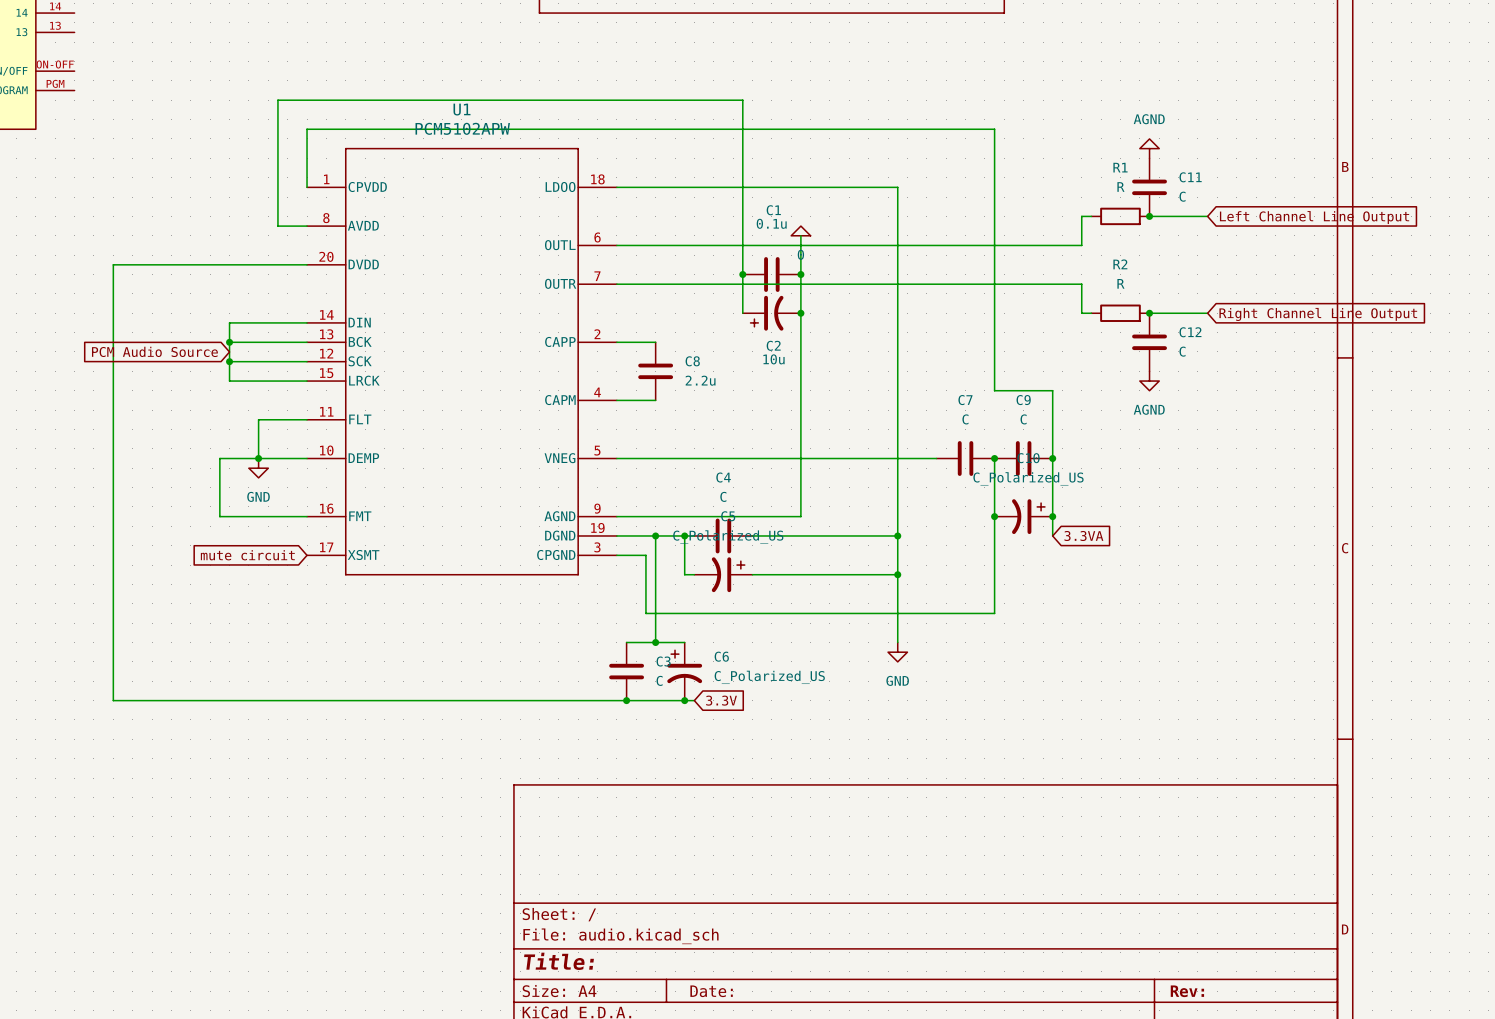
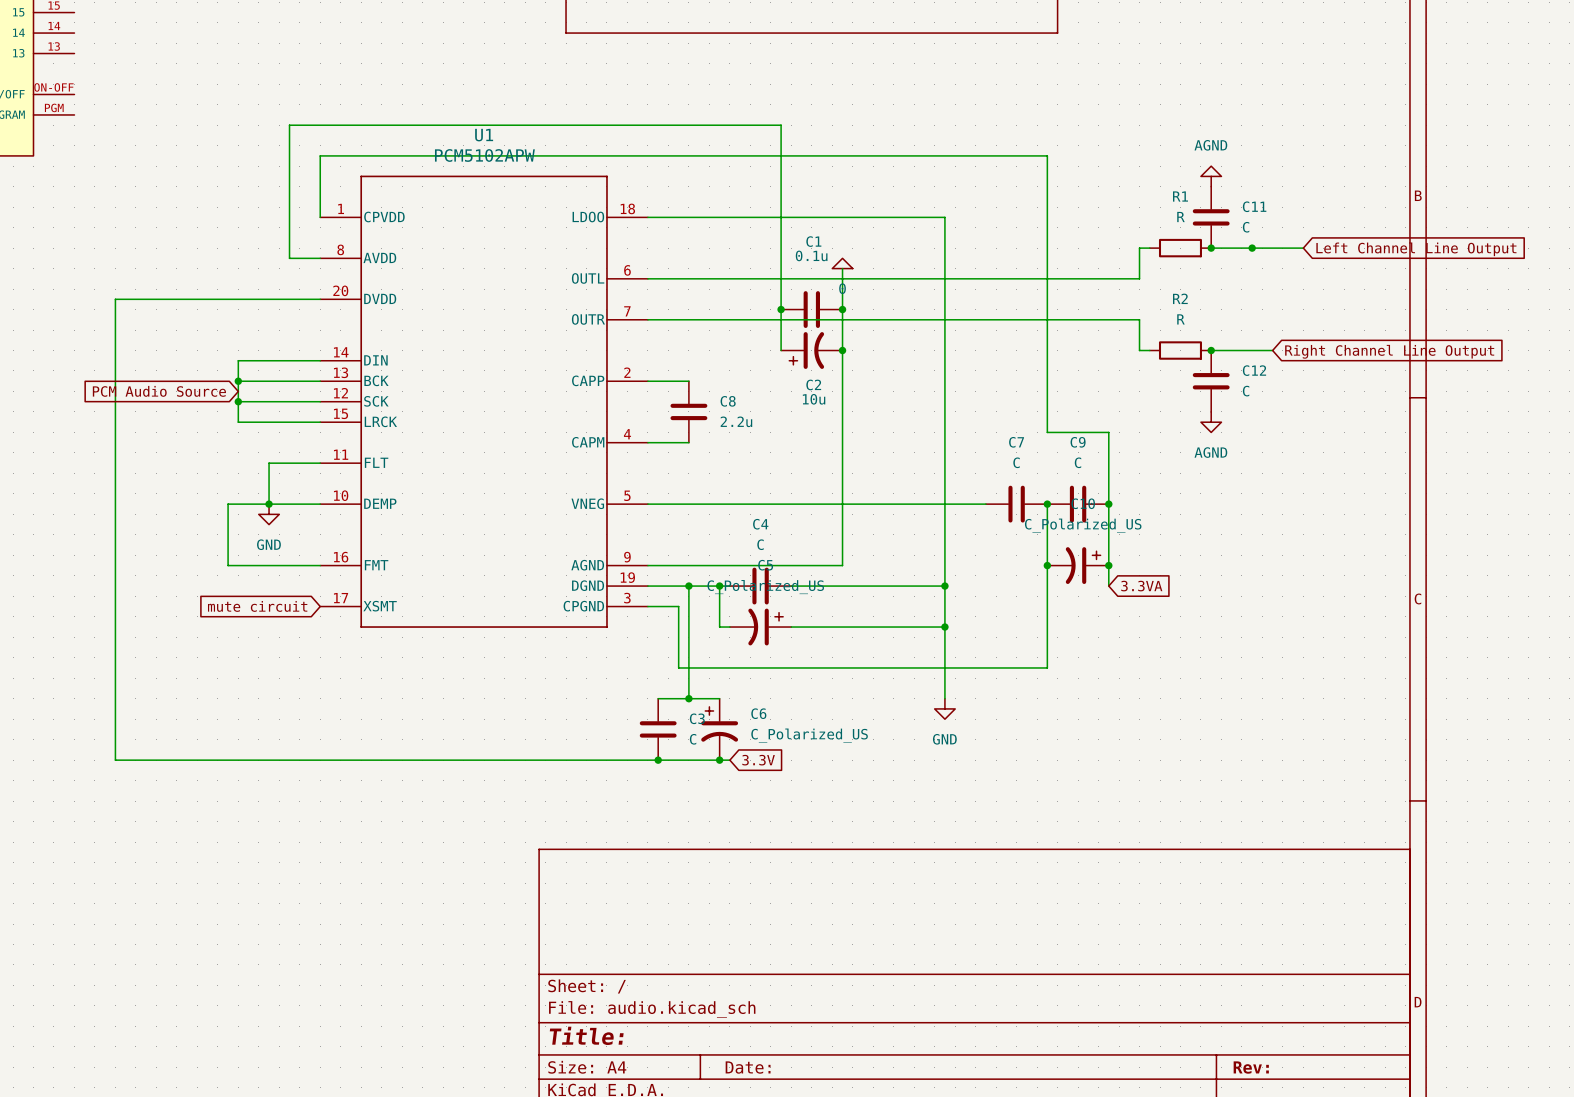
junction: none -> (1252, 248)
wire: none -> (1272, 248) (1303, 248)
global label position: Left Channel Line Output (1314, 217) -> Left Channel Line Output (1416, 249)

